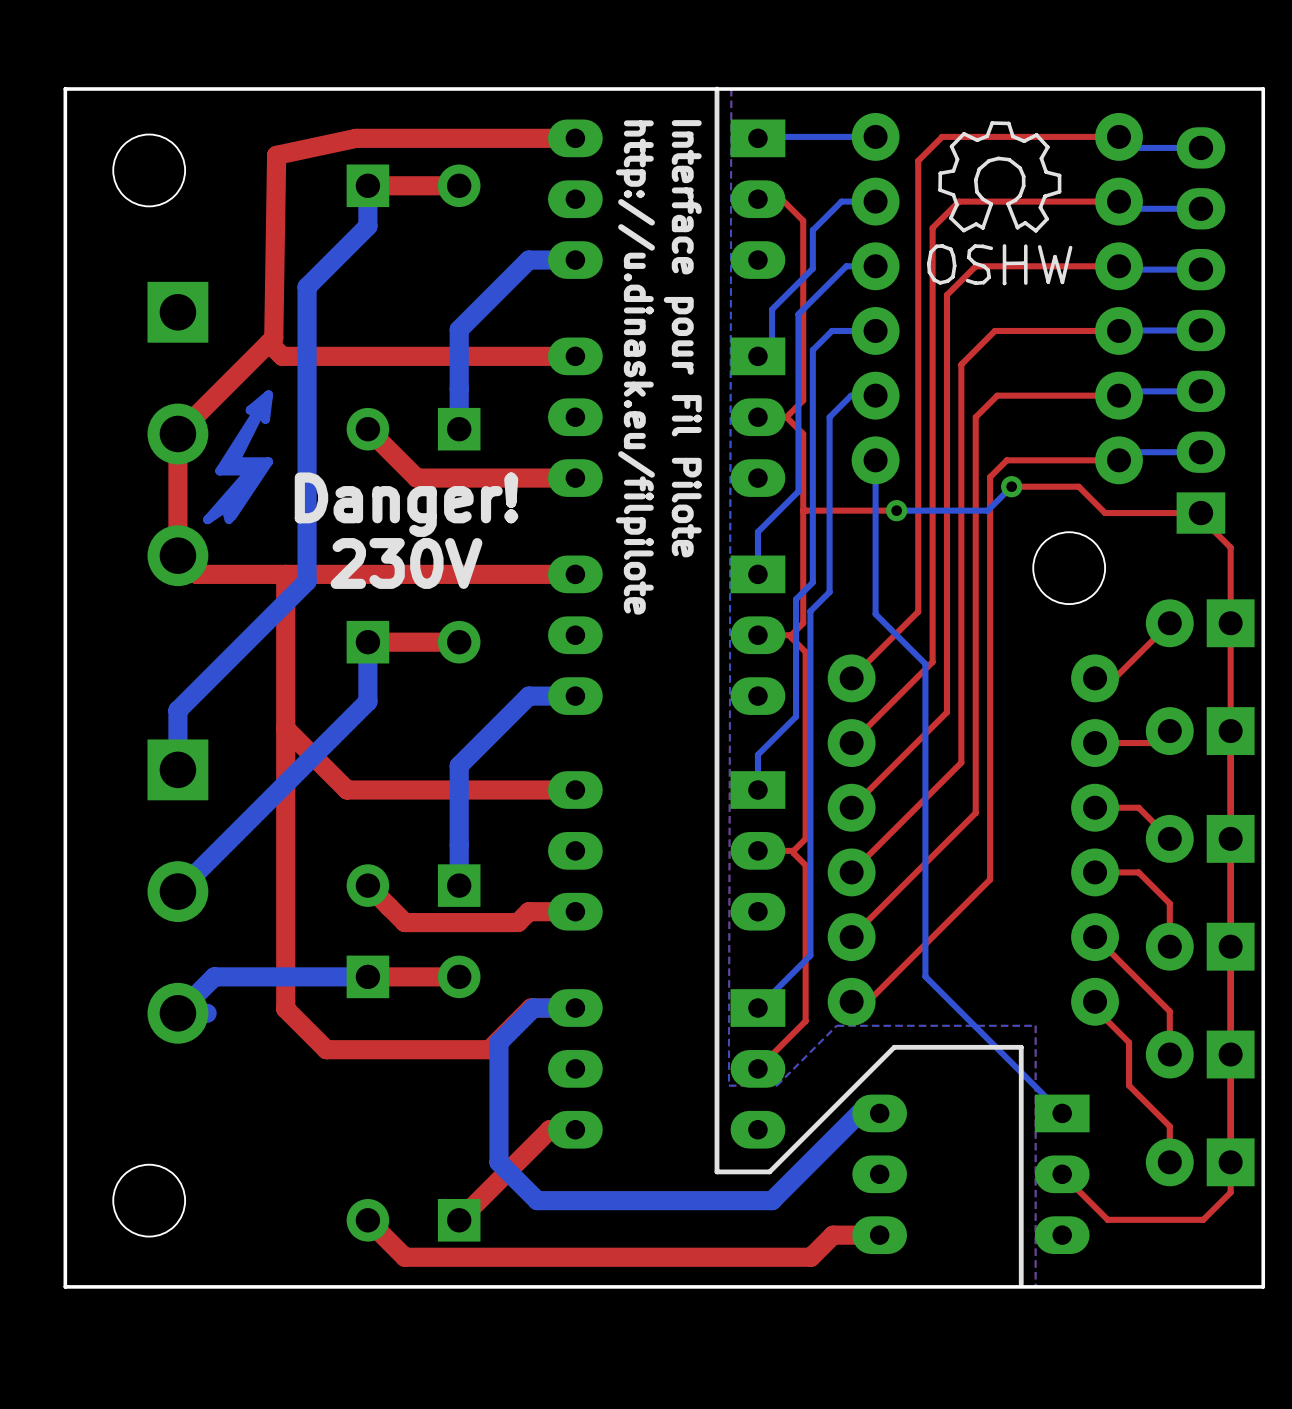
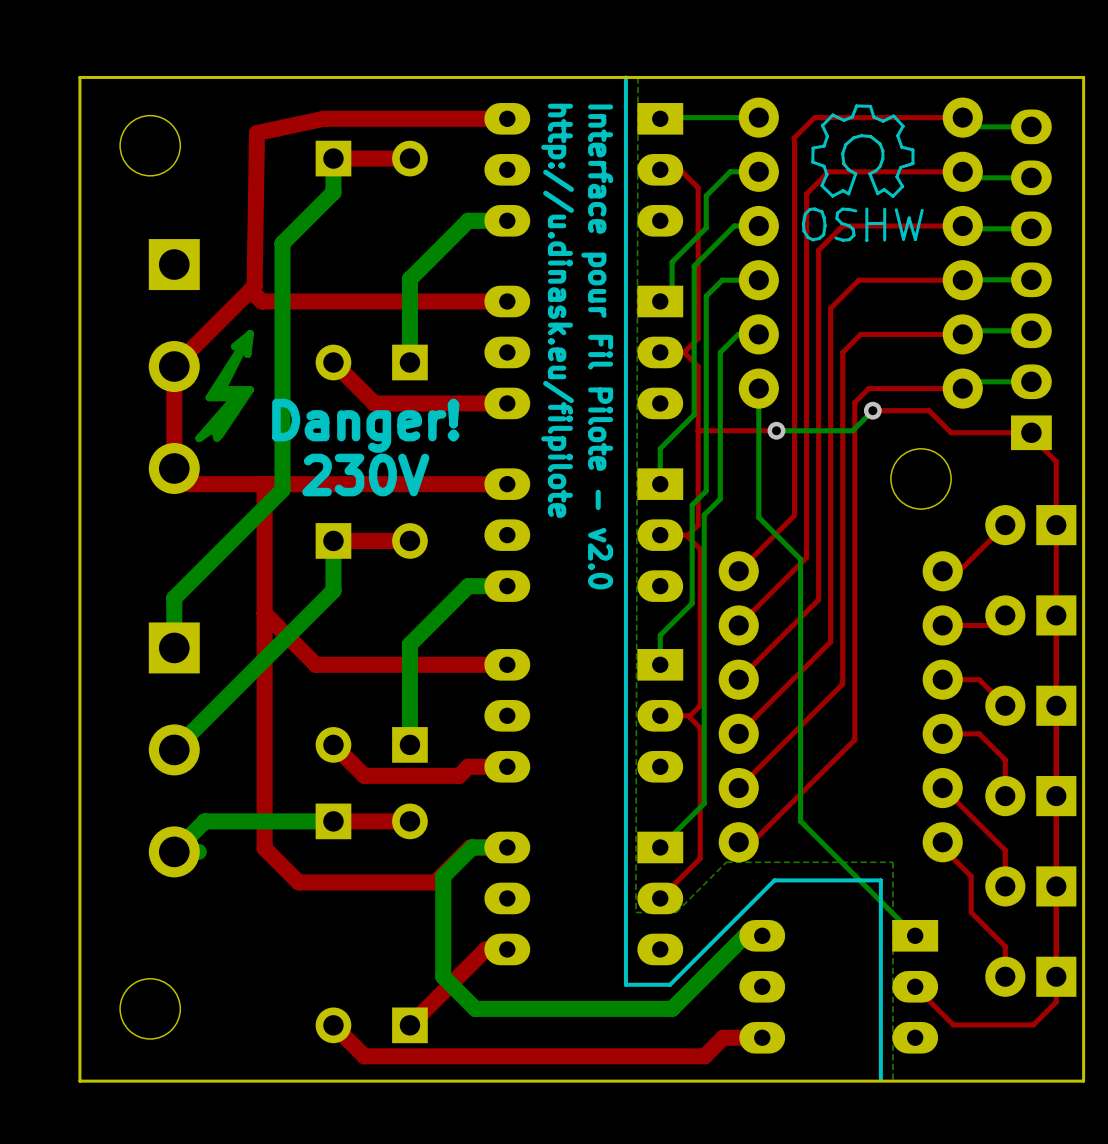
text: Interface pour Fil Pilote (682, 338) -> Interface pour Fil Pilote - v2.0 (597, 346)

